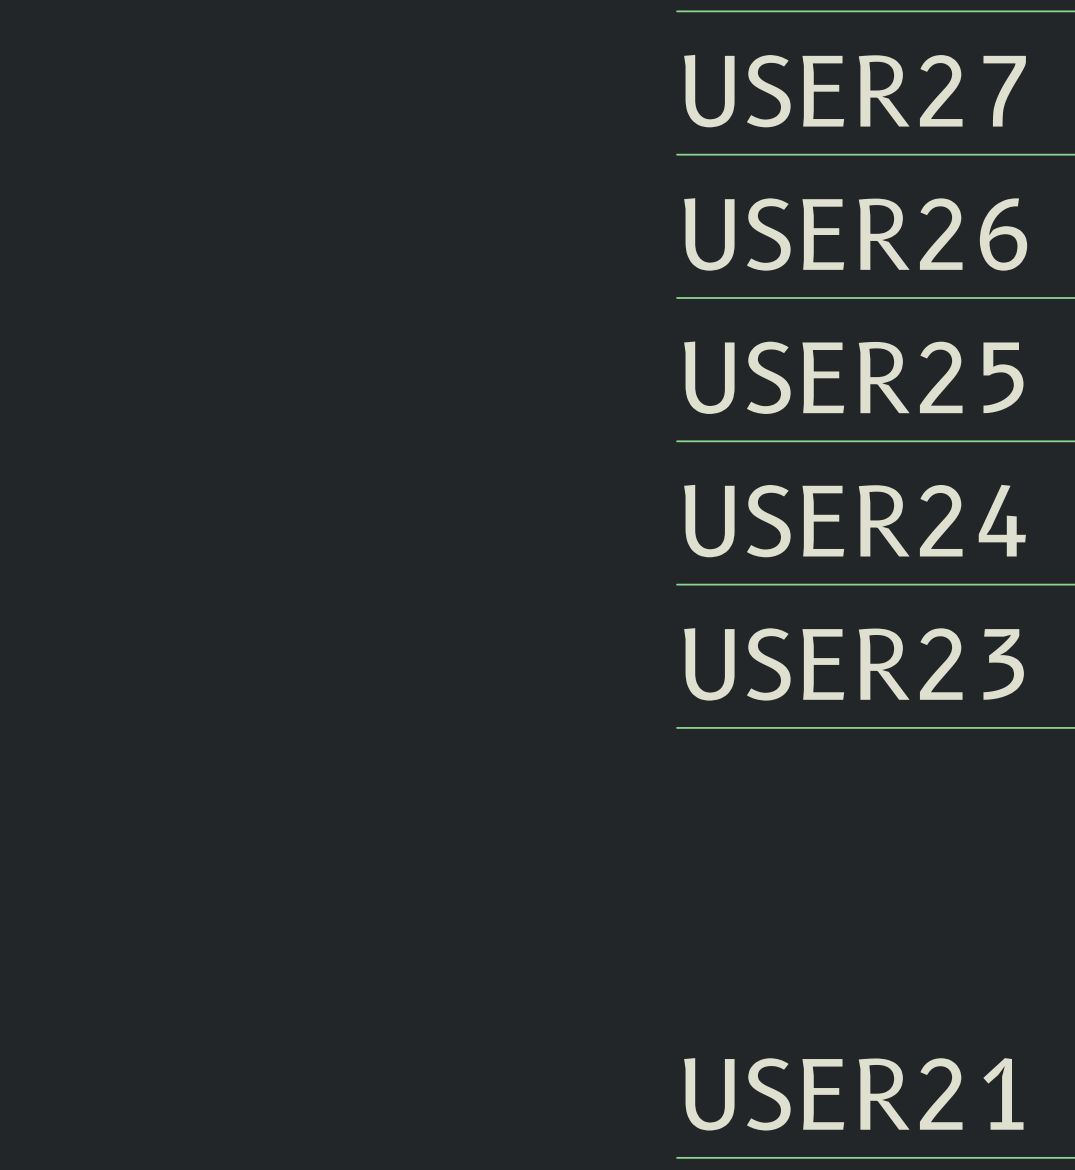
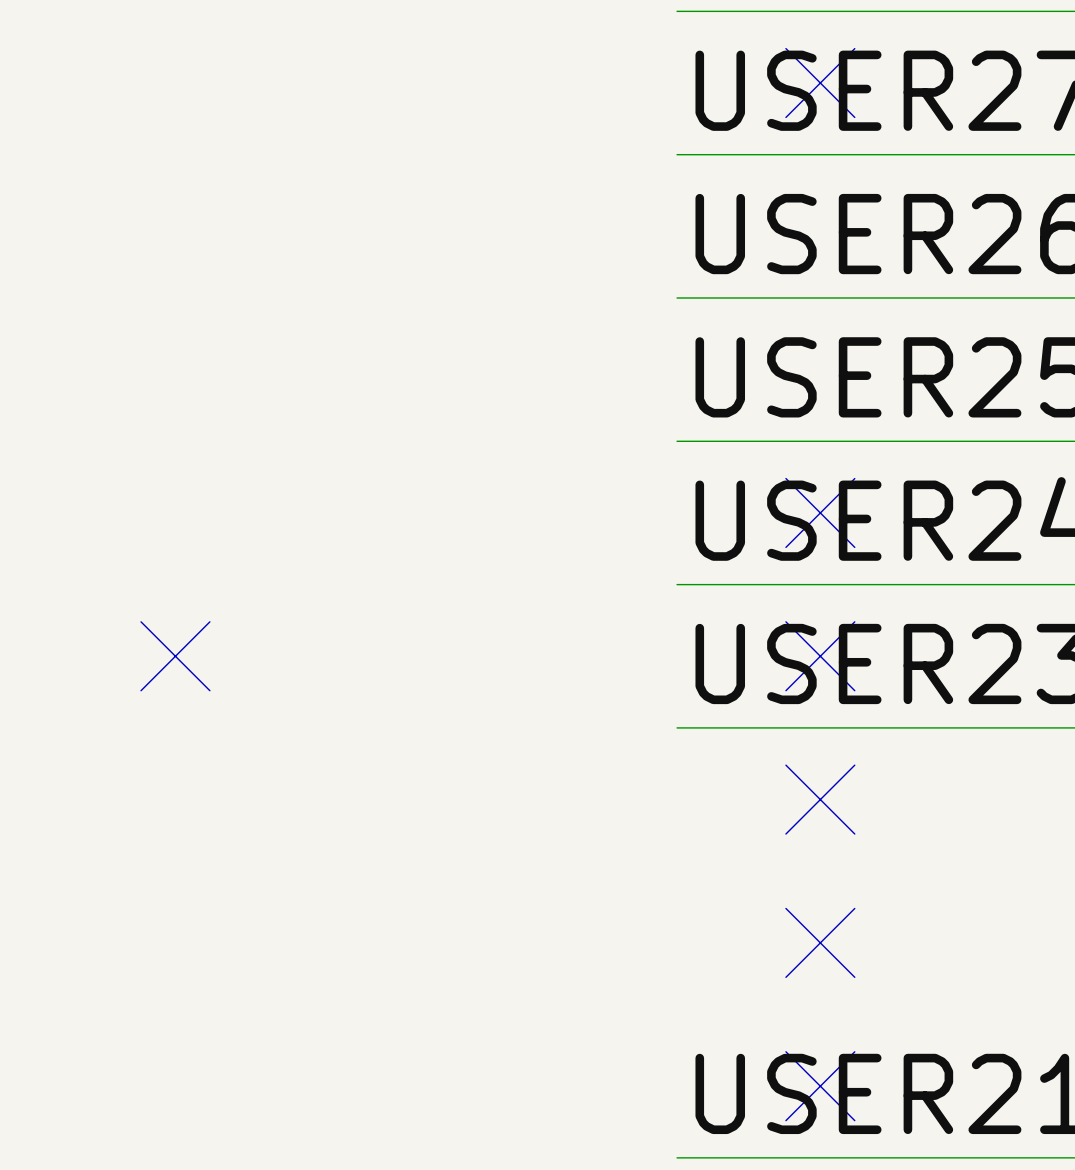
no-connect mark: none -> (820, 83)
no-connect mark: none -> (820, 512)
no-connect mark: none -> (175, 656)
no-connect mark: none -> (820, 656)
no-connect mark: none -> (820, 799)
no-connect mark: none -> (820, 942)
no-connect mark: none -> (820, 1086)

